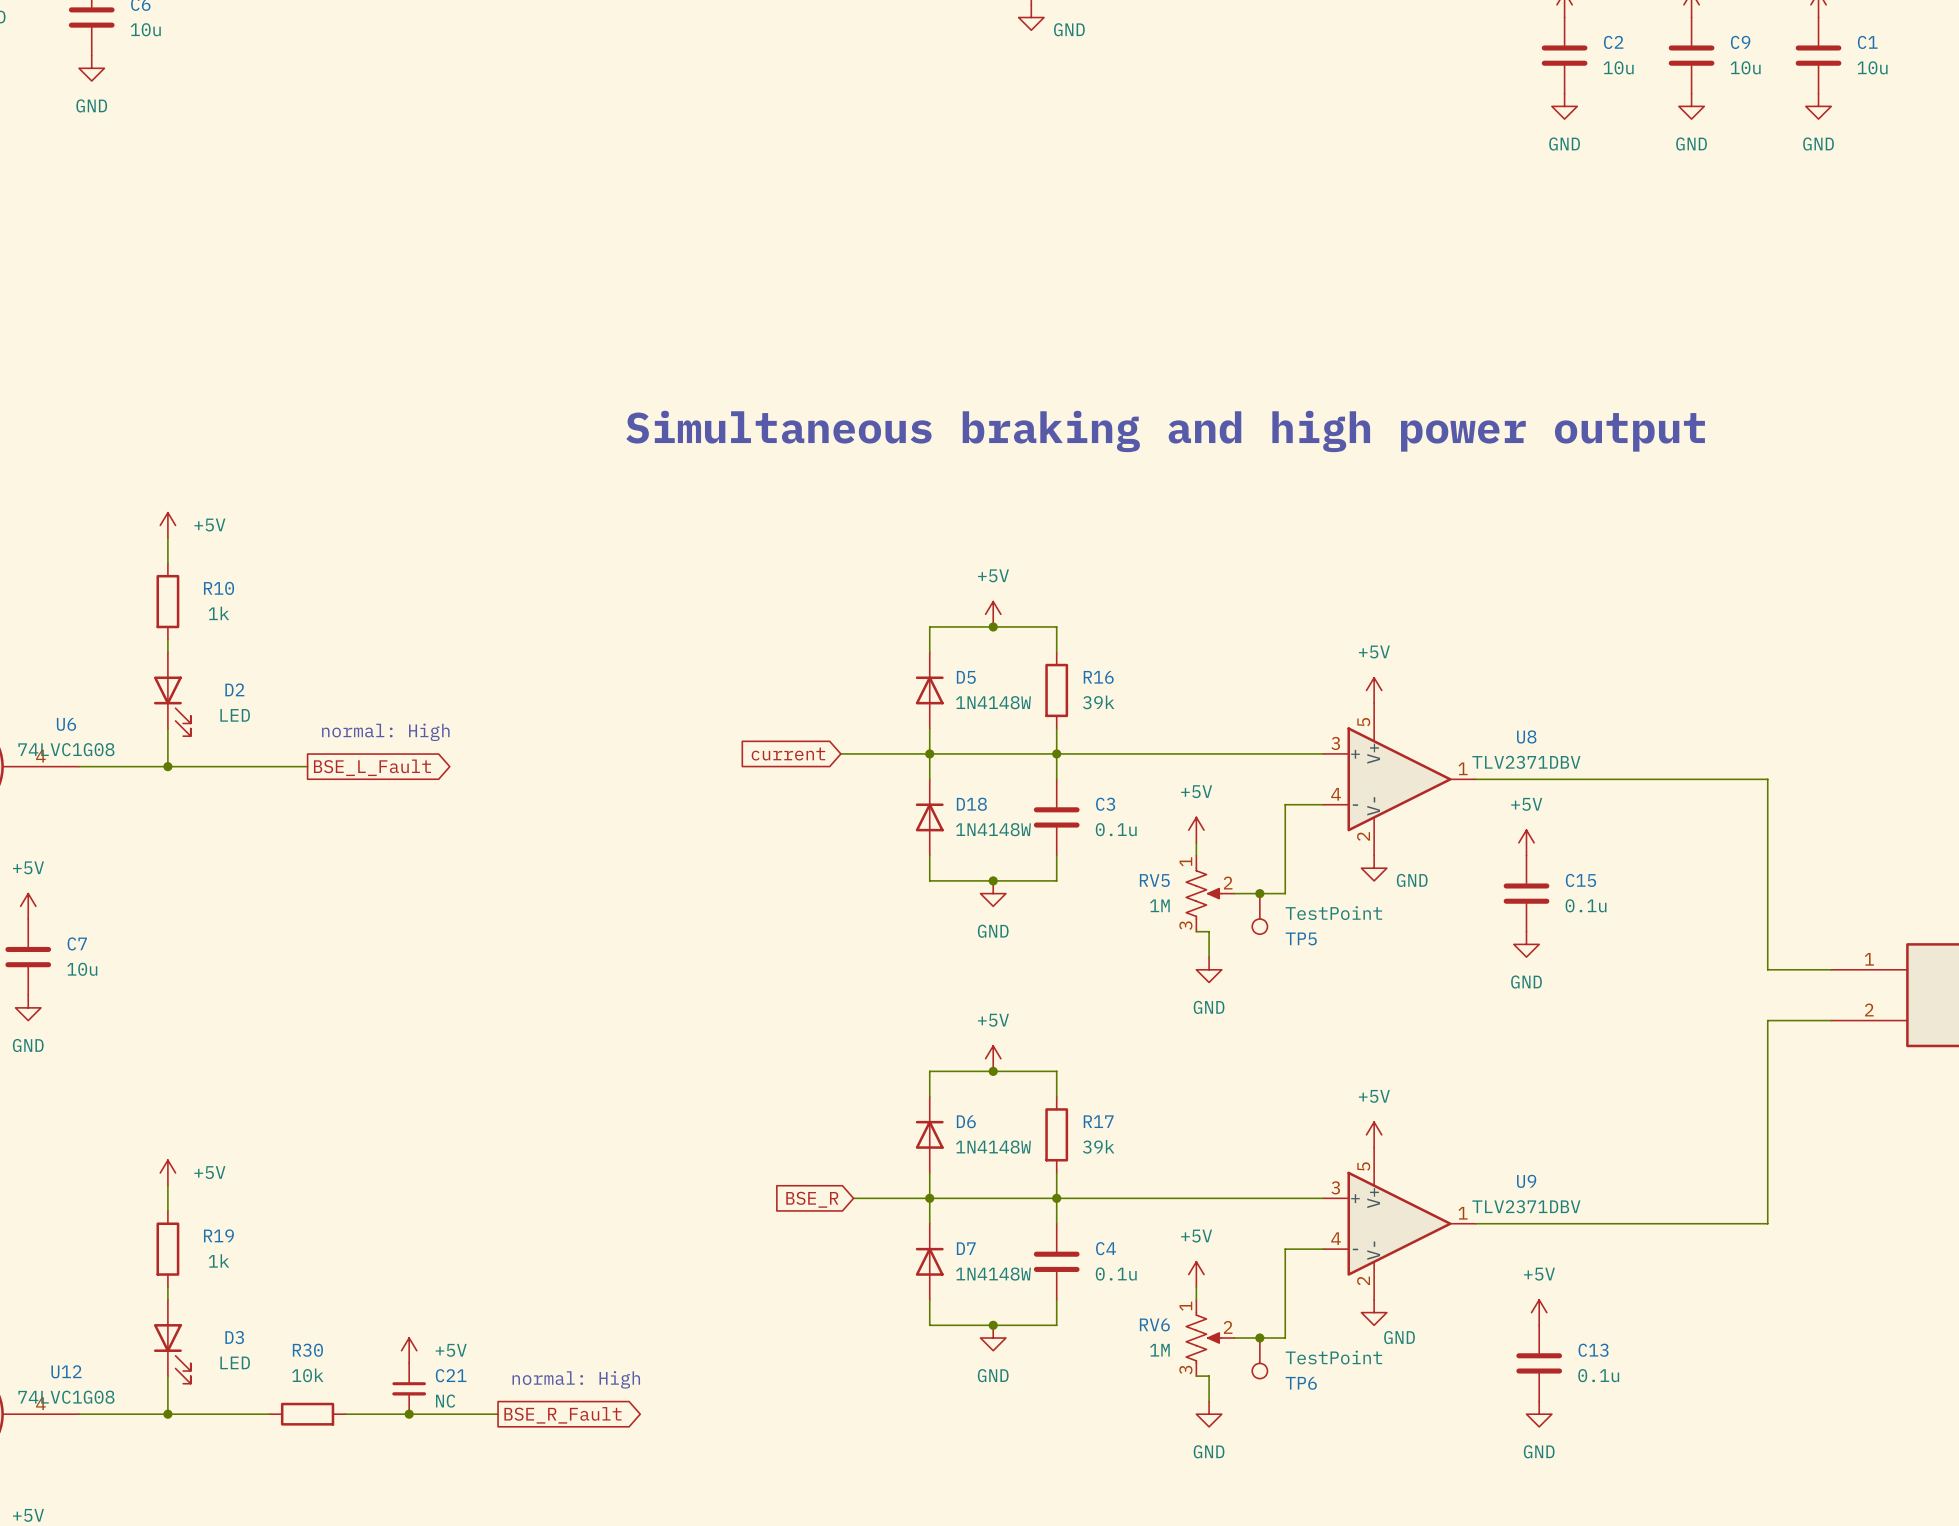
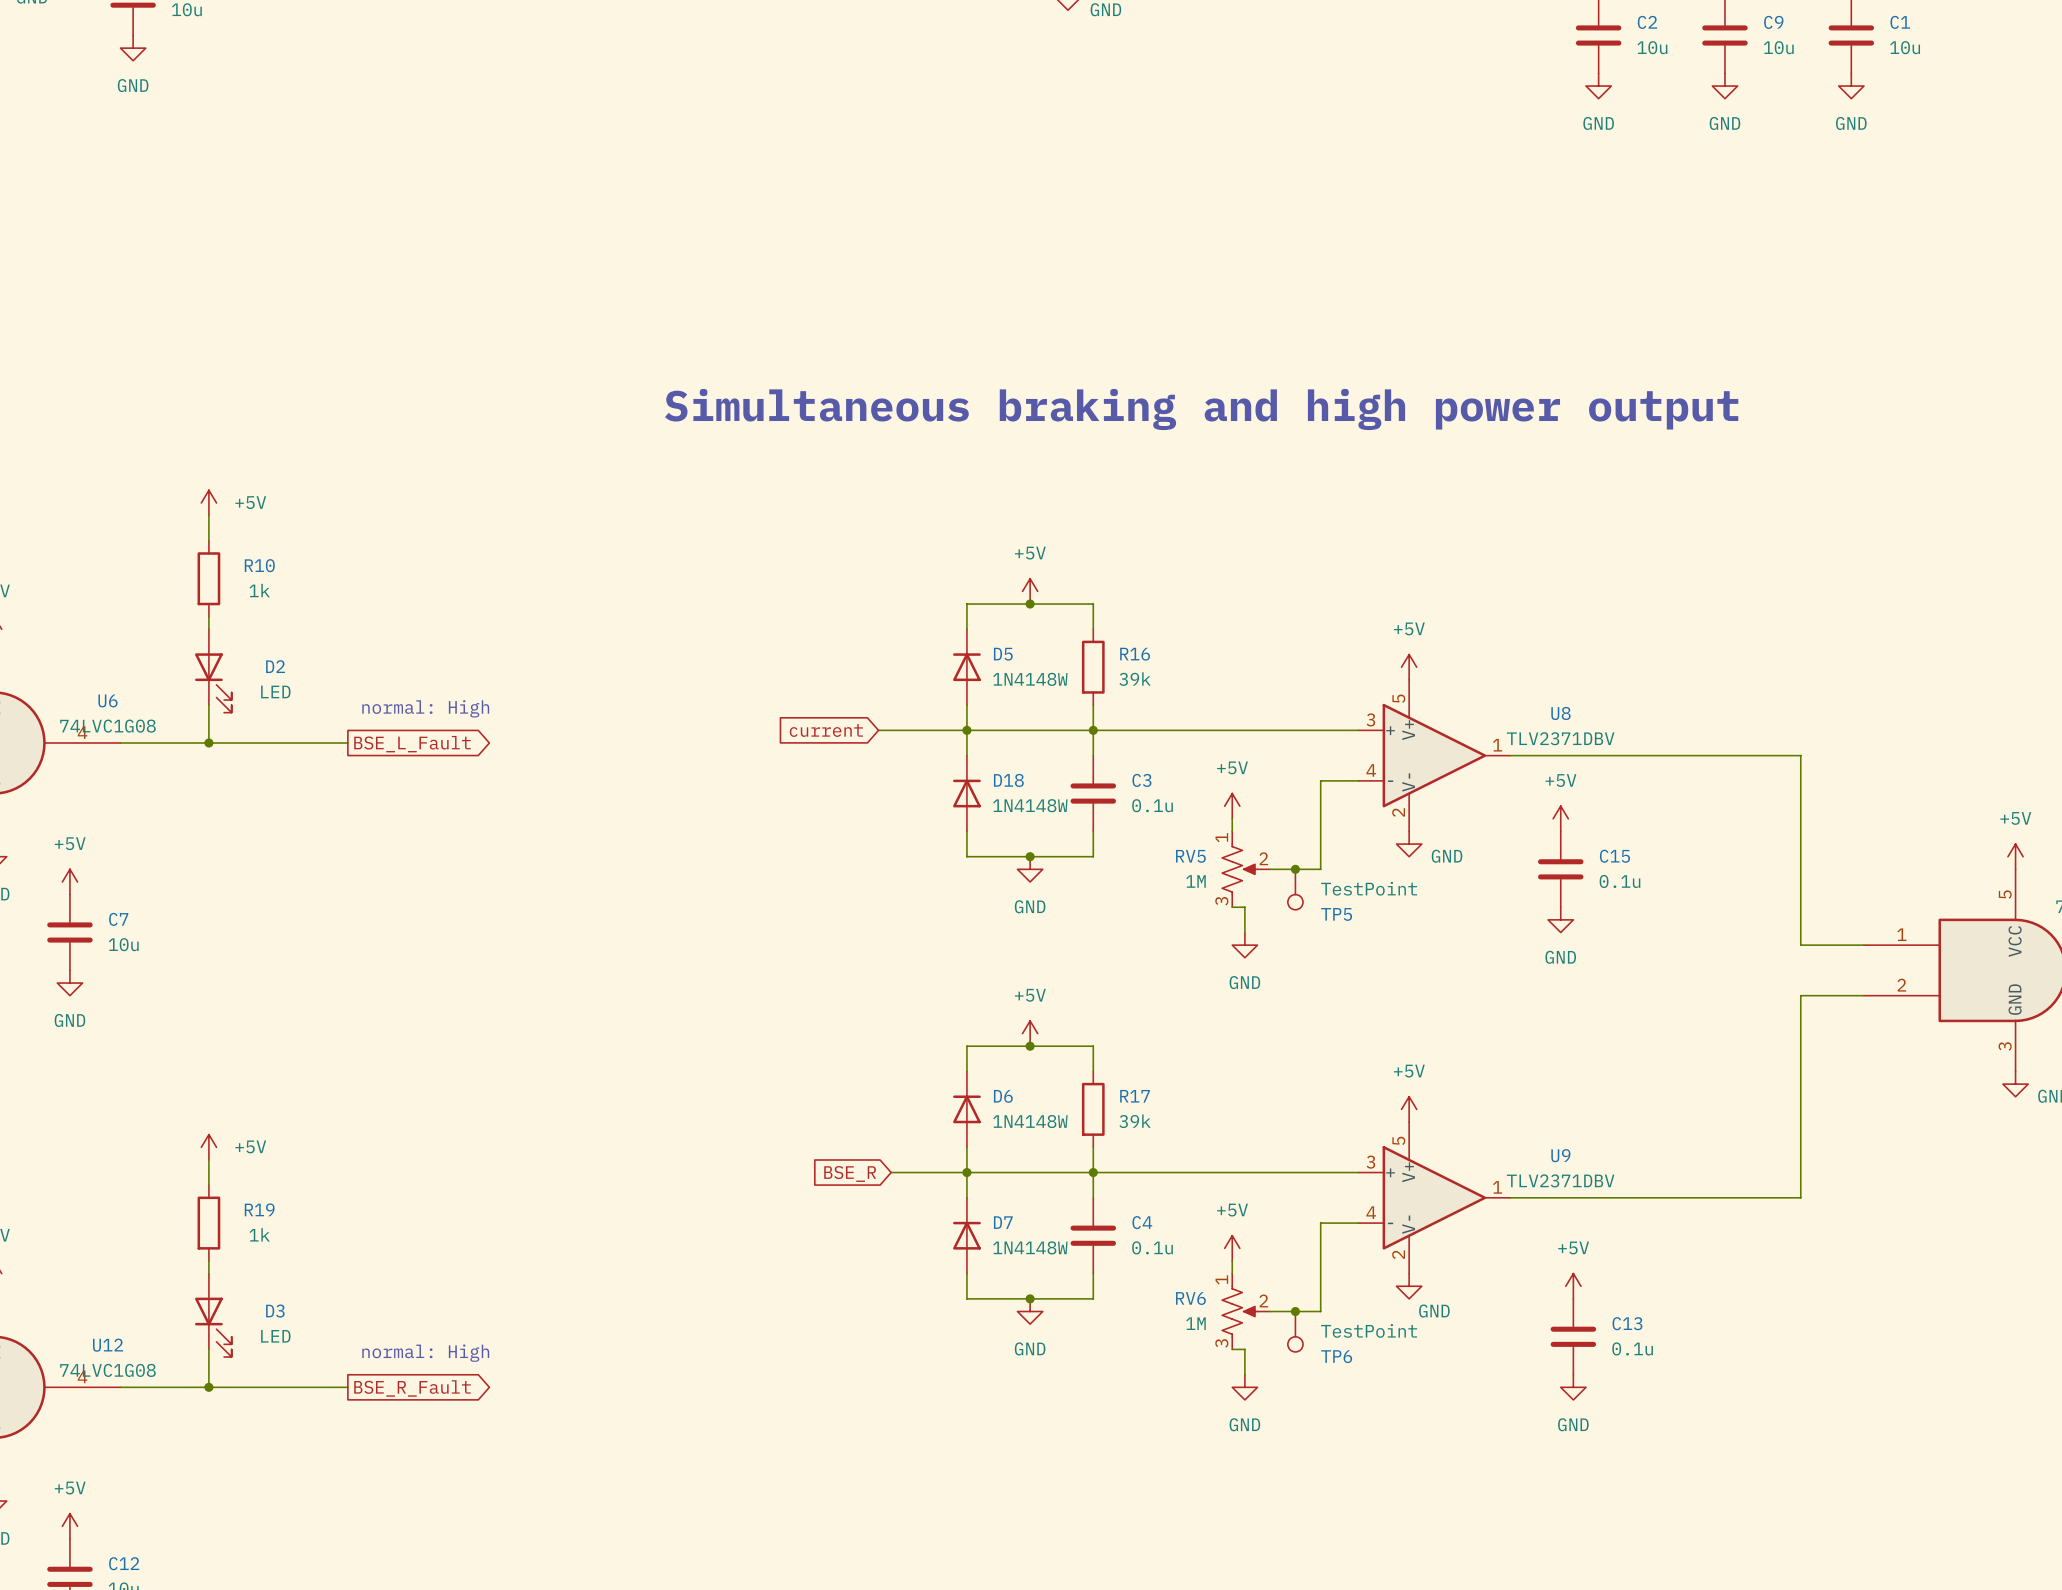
power symbol: +5V (409, 1350) -> none
text position: normal: High (576, 1379) -> normal: High (425, 1353)
C21: NC (409, 1388) -> none
wire: none -> (309, 1387) (347, 1387)
R30: 10k (307, 1414) -> none
wire: (345, 1414) (498, 1414) -> none
junction: (409, 1414) -> none
global label position: BSE_R_Fault (562, 1415) -> BSE_R_Fault (412, 1388)

